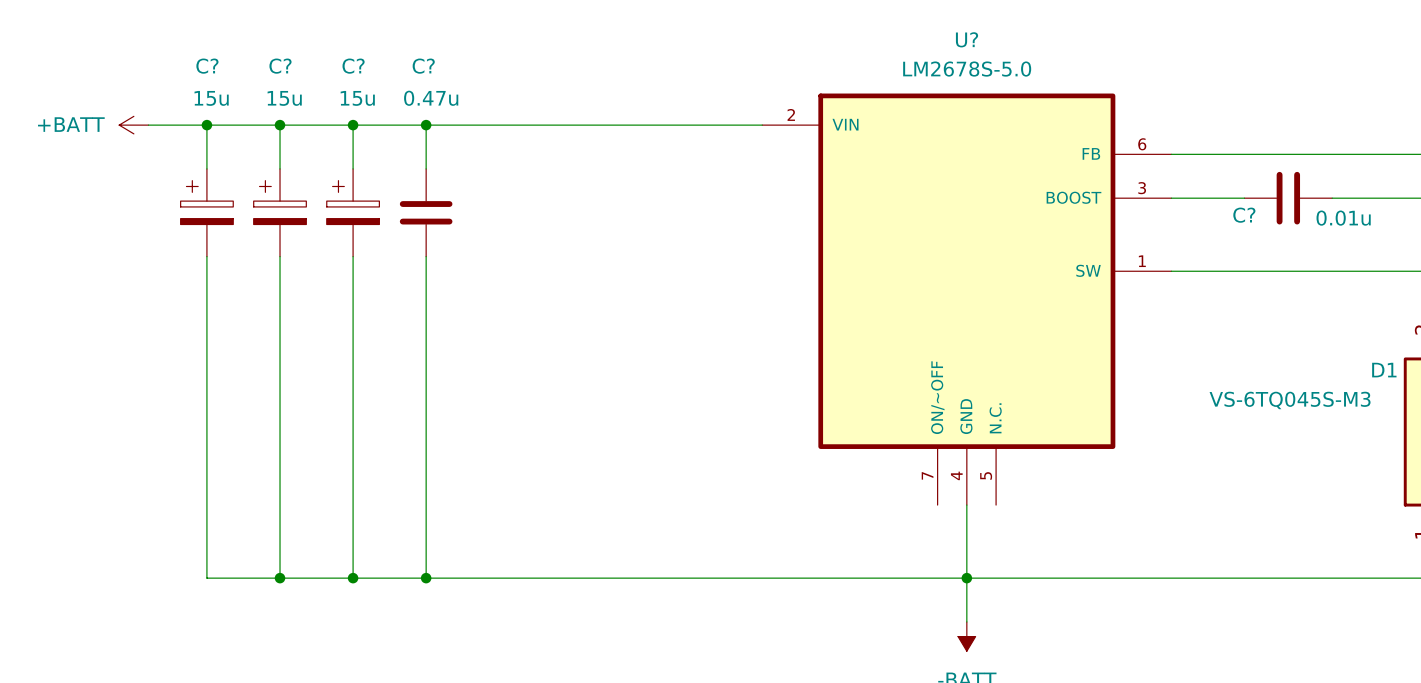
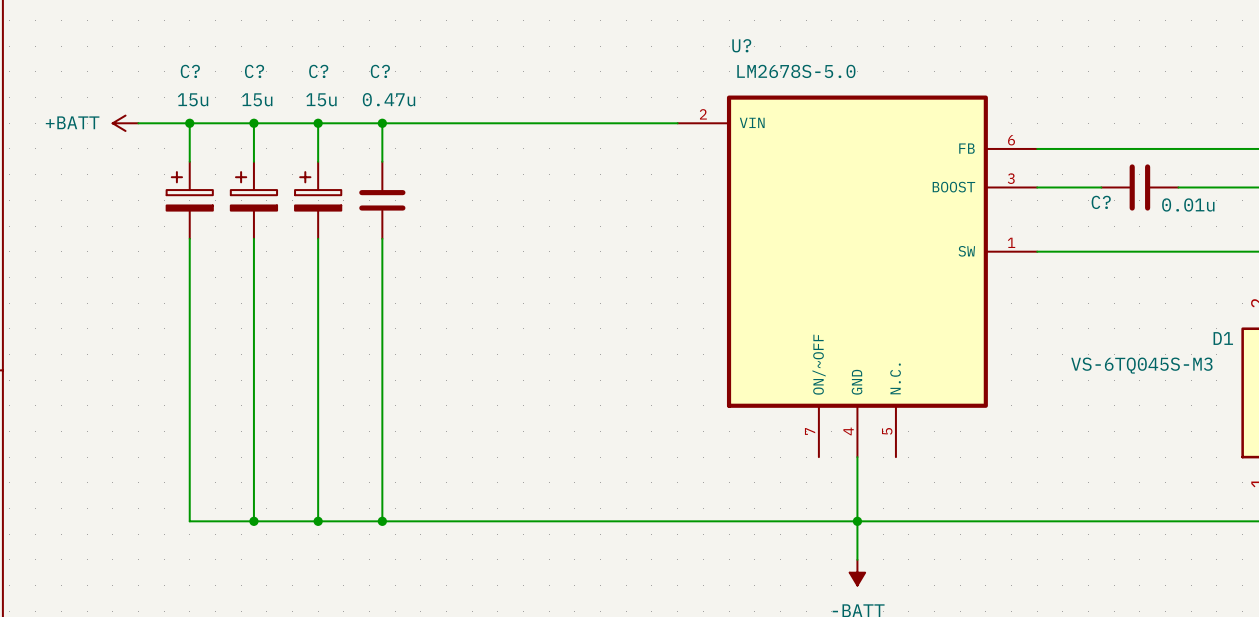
U? name position: U? (967, 39) -> U? (741, 45)
U? value position: LM2678S-5.0 (967, 69) -> LM2678S-5.0 (796, 71)
U? symbol: [762, 93, 1172, 506] -> [677, 95, 1038, 458]

